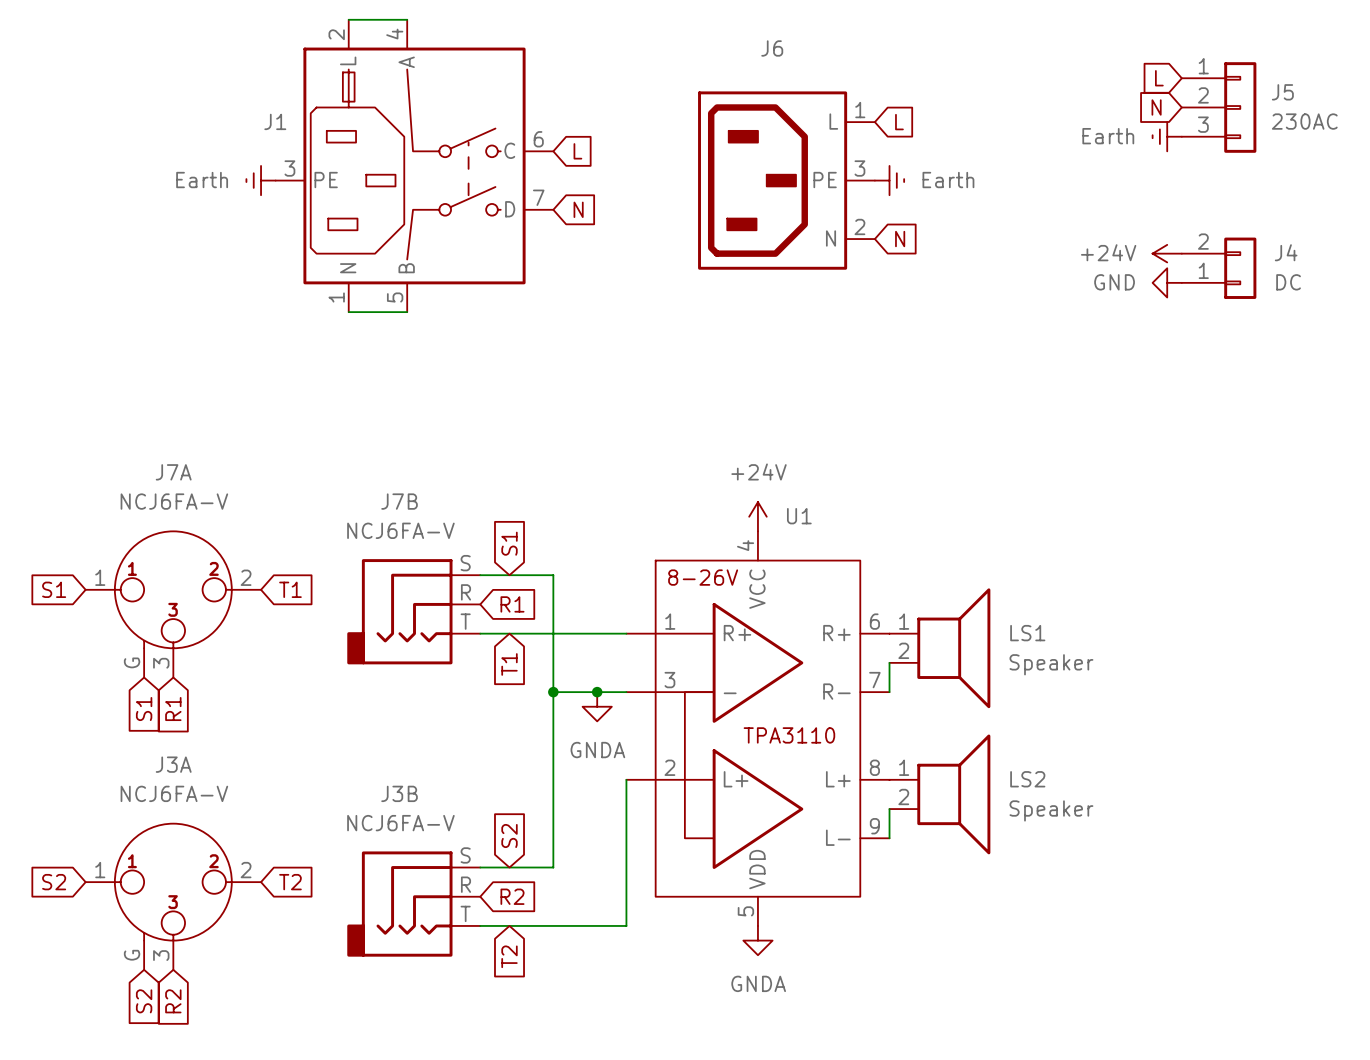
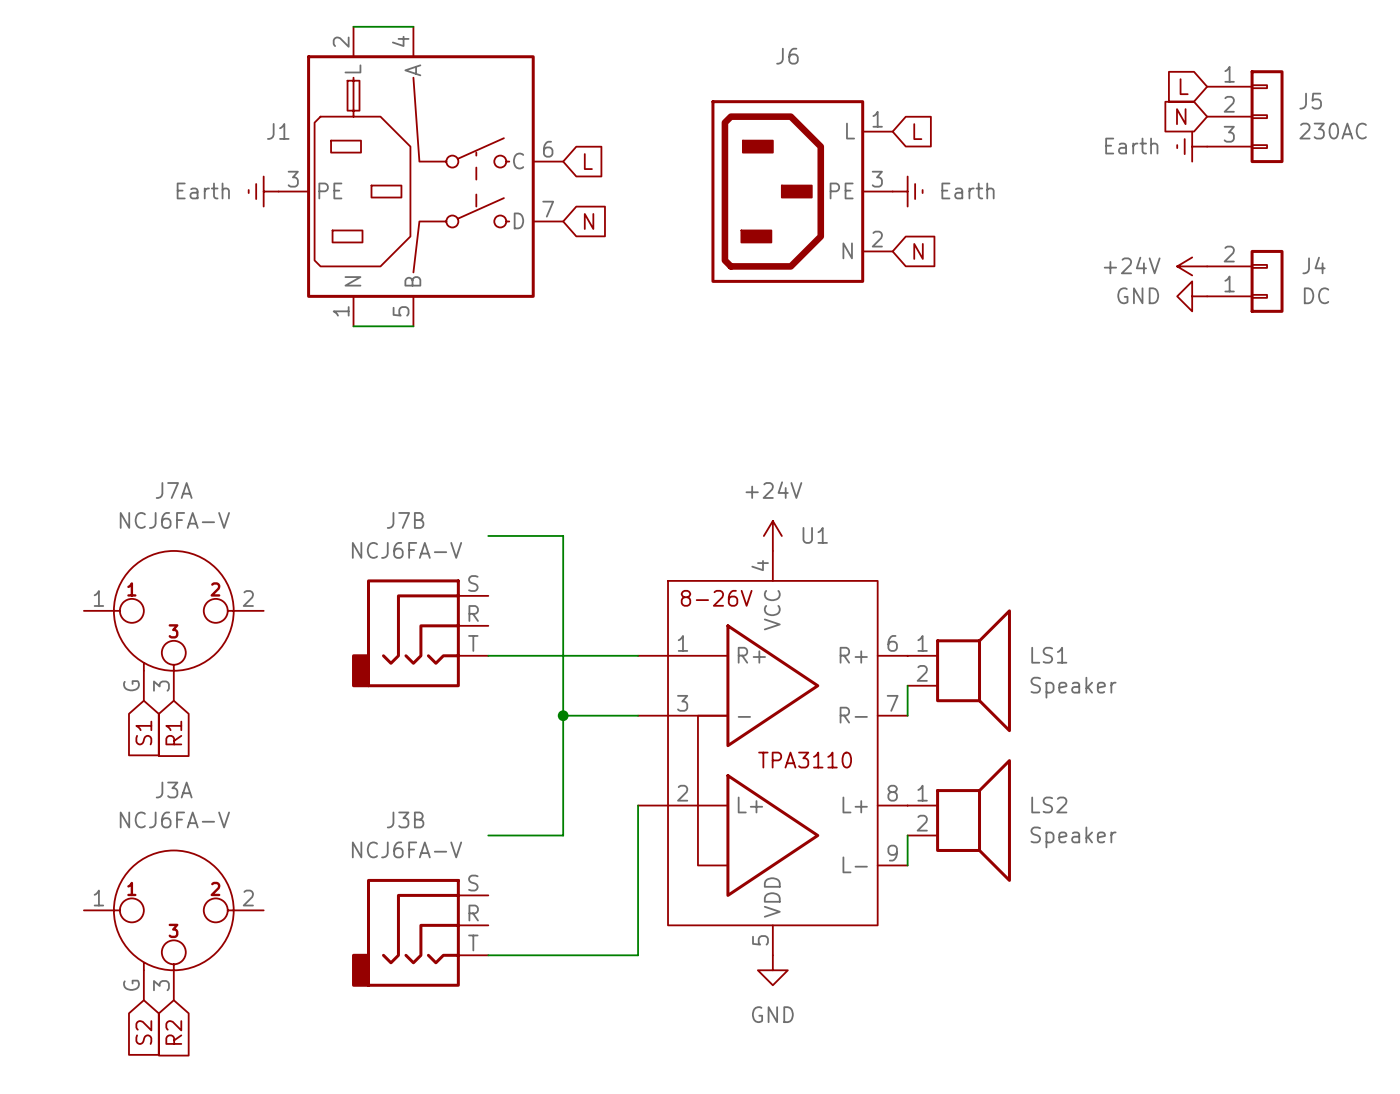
global label: S1 (509, 543) -> none
wire: (480, 575) (553, 575) -> (488, 535) (563, 535) (563, 595)
global label: S1 (54, 589) -> none
global label: T1 (290, 589) -> none
global label: R1 (512, 604) -> none
global label: T1 (509, 664) -> none
junction: (597, 692) -> none
power symbol: GNDA (597, 706) -> none
wire: (553, 809) (553, 867) (480, 867) -> (563, 835) (488, 835)
global label: S2 (509, 835) -> none
global label: S2 (54, 882) -> none
global label: T2 (290, 882) -> none
global label: R2 (512, 896) -> none
power symbol: GNDA (757, 940) -> GND (772, 970)
global label: T2 (509, 956) -> none

